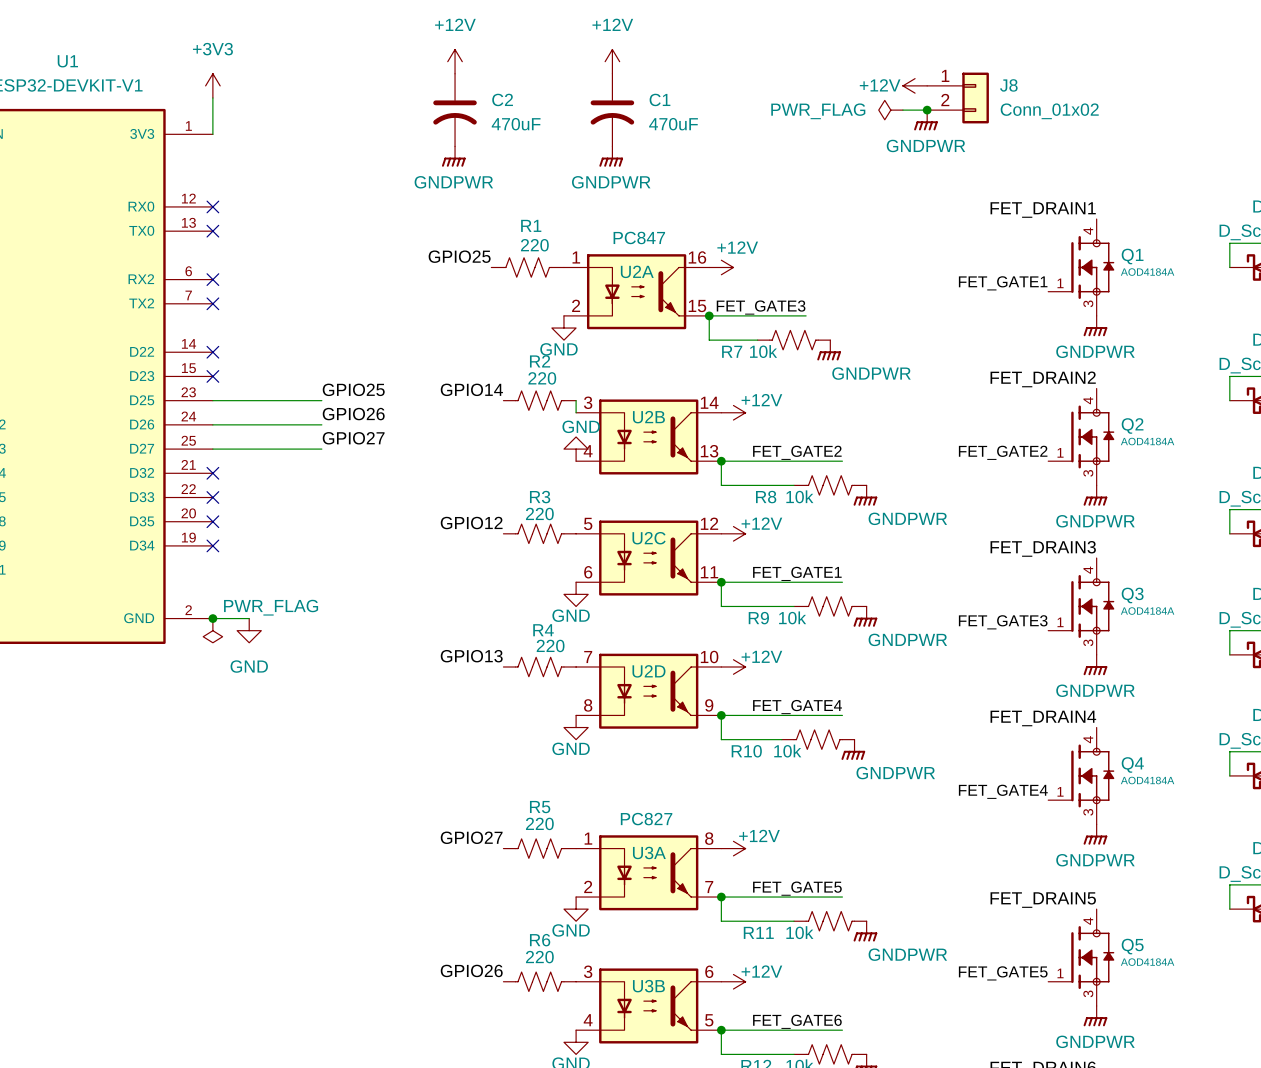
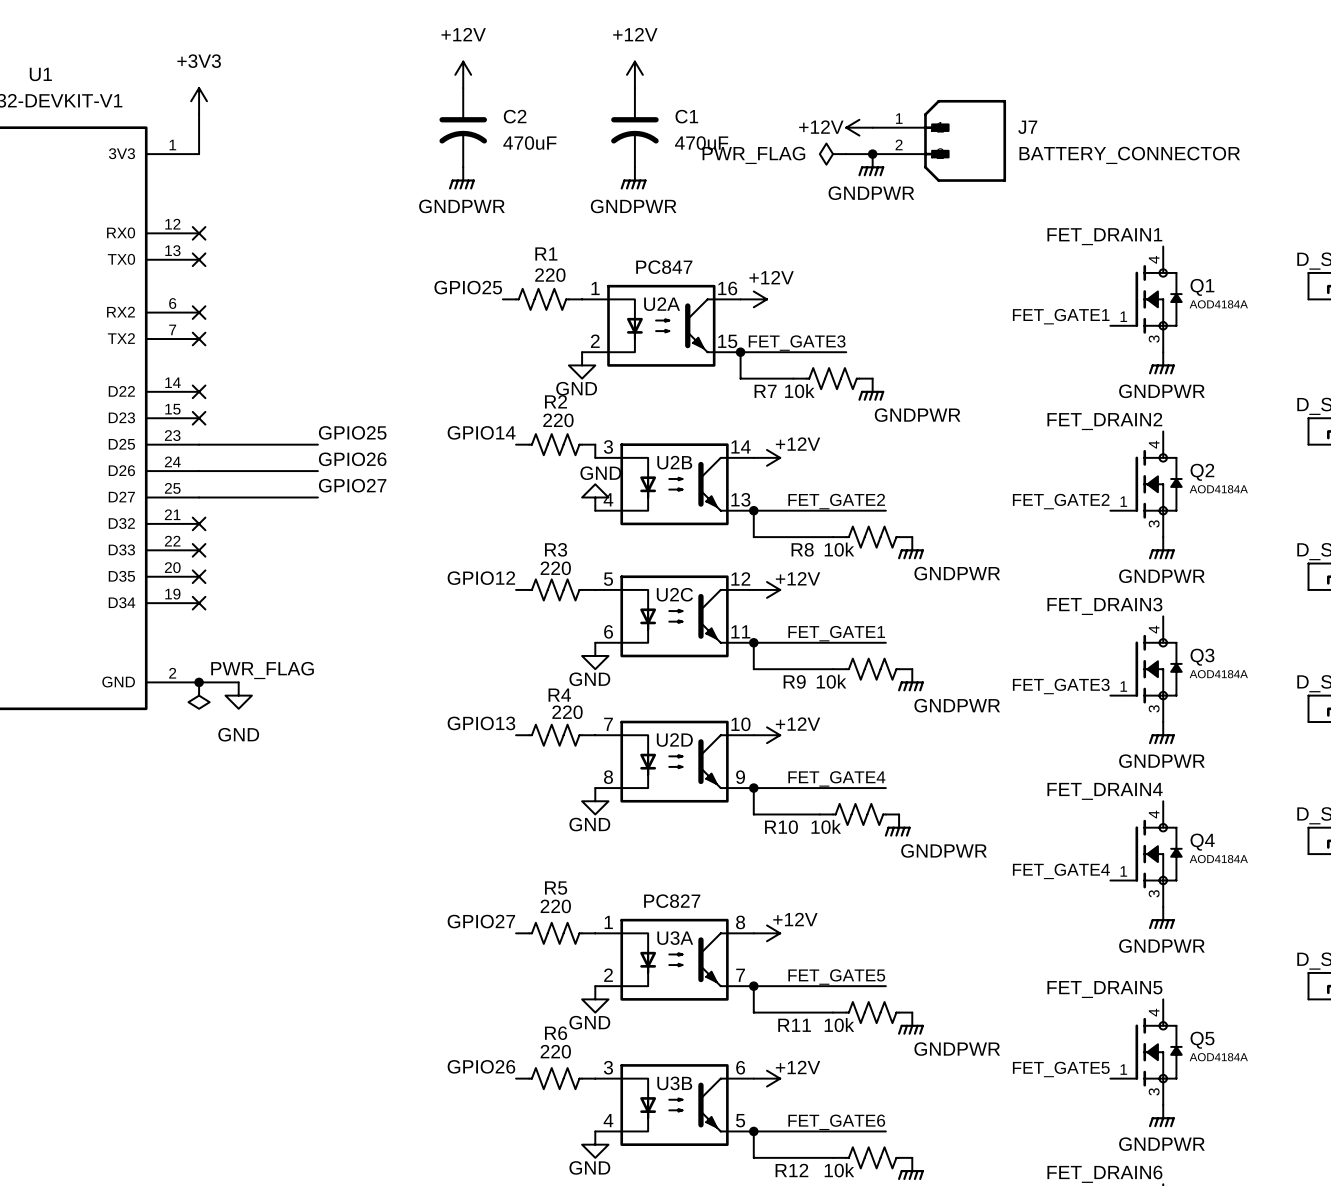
power symbol position: +12V (915, 85) -> +12V (859, 127)
J8: Conn_01x02 (958, 98) -> none
power symbol position: PWR_FLAG (890, 110) -> PWR_FLAG (833, 154)
wire: (902, 110) (927, 110) -> (846, 154) (872, 154)
junction: (927, 110) -> none
power symbol position: GNDPWR (925, 120) -> GNDPWR (871, 165)
J7: none -> BATTERY_CONNECTOR (939, 140)
junction: none -> (872, 154)

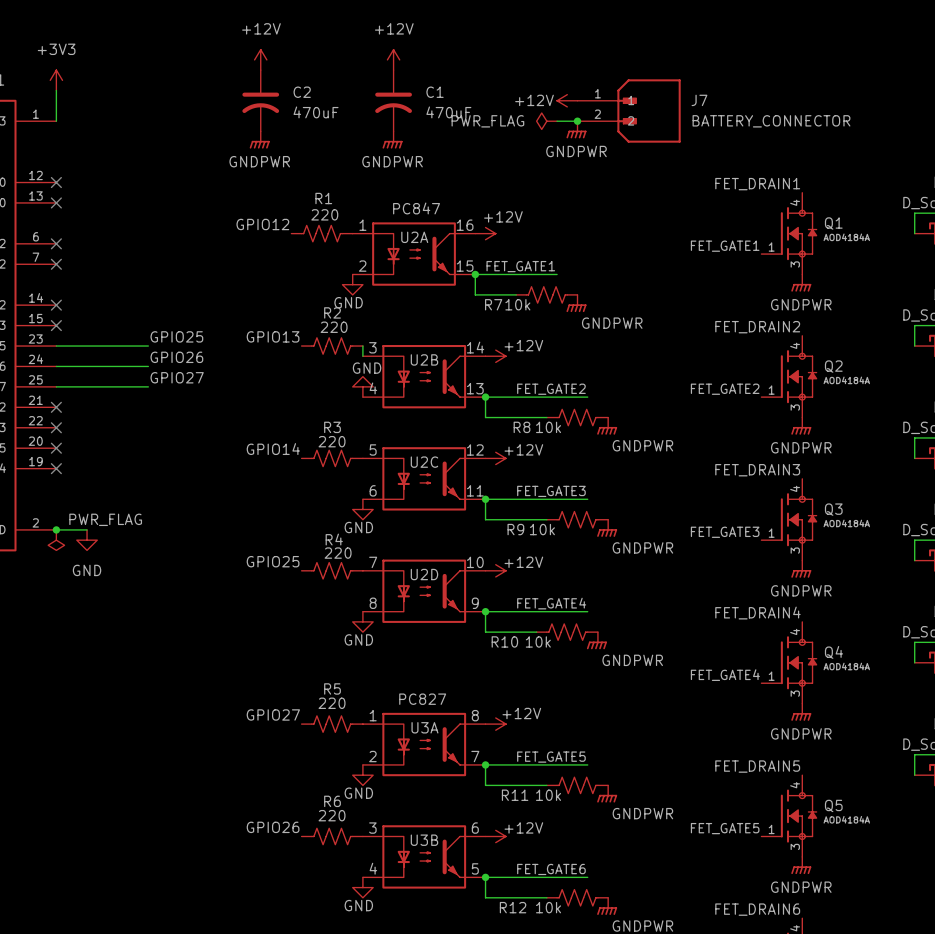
label: GPIO25 (468, 287) -> GPIO12 (262, 224)
label: FET_GATE3 (797, 343) -> FET_GATE1 (520, 266)
label: GPIO14 (481, 432) -> GPIO13 (273, 336)
label: GPIO12 (481, 578) -> GPIO14 (273, 449)
label: FET_GATE1 (836, 633) -> FET_GATE3 (551, 491)
label: GPIO13 (481, 723) -> GPIO25 (273, 561)

